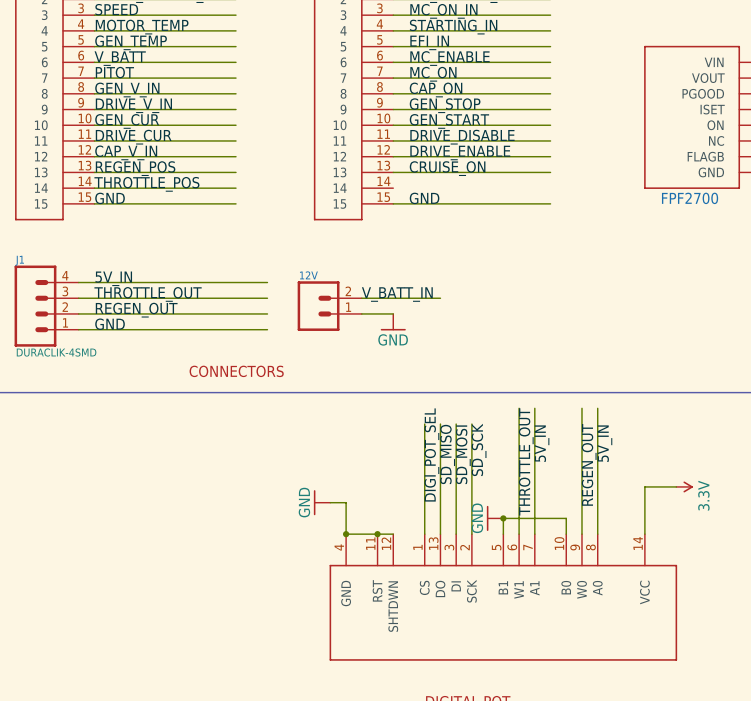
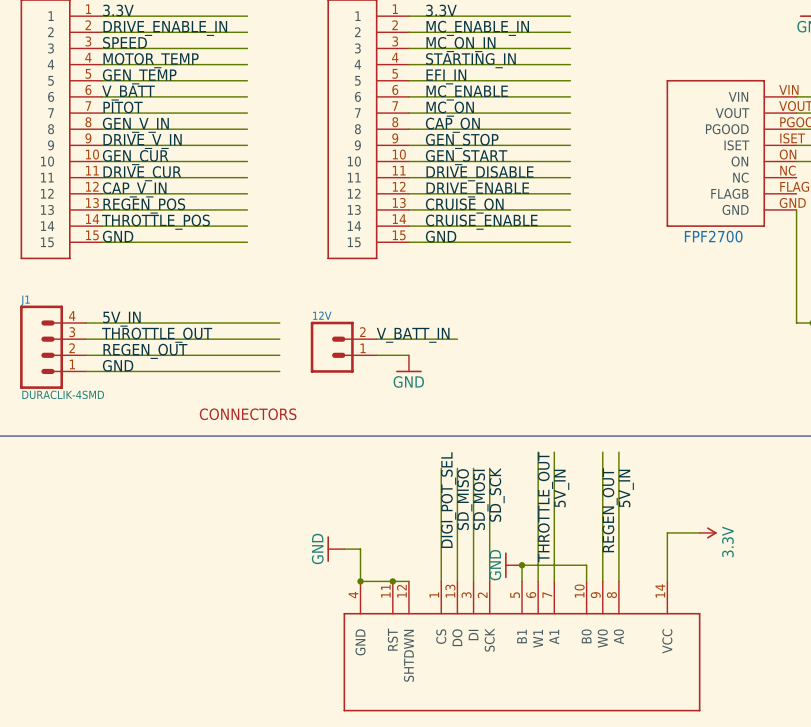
label: none -> CRUISE_ENABLE (481, 222)
wire: none -> (408, 226) (570, 226)

